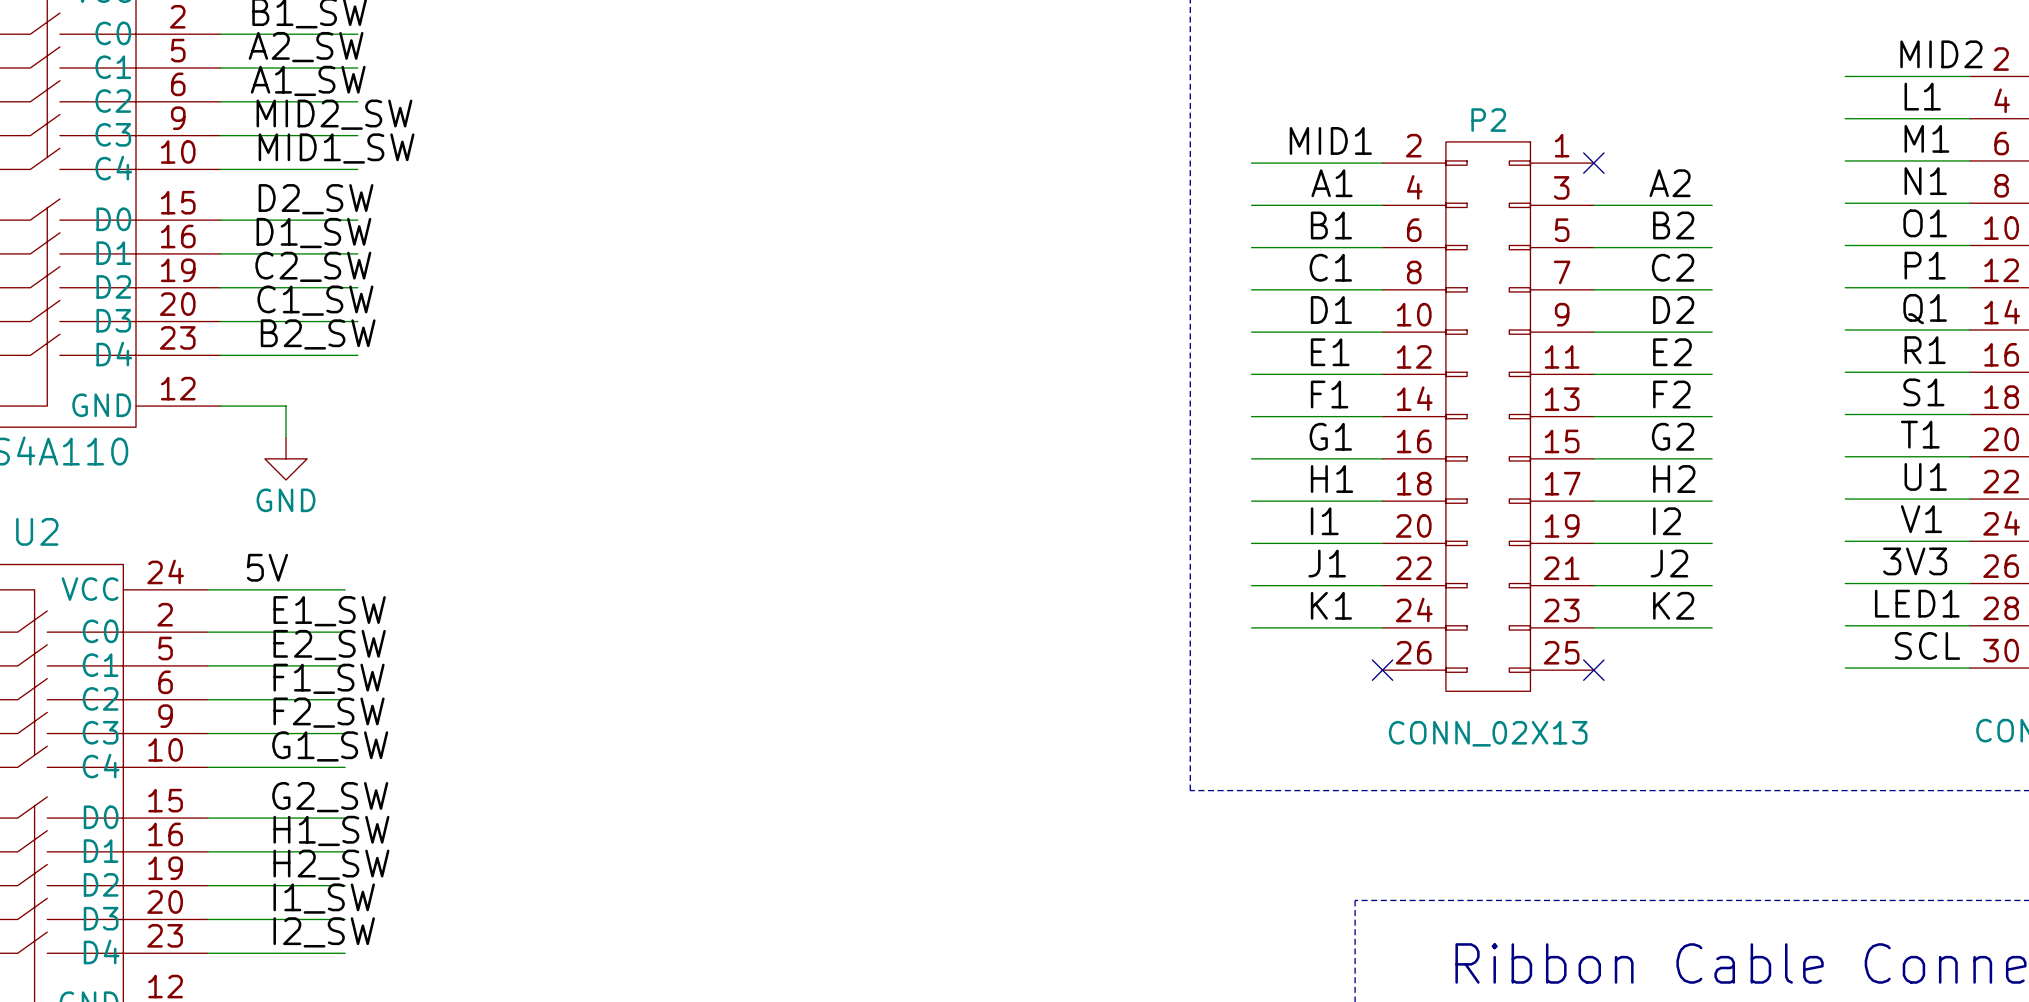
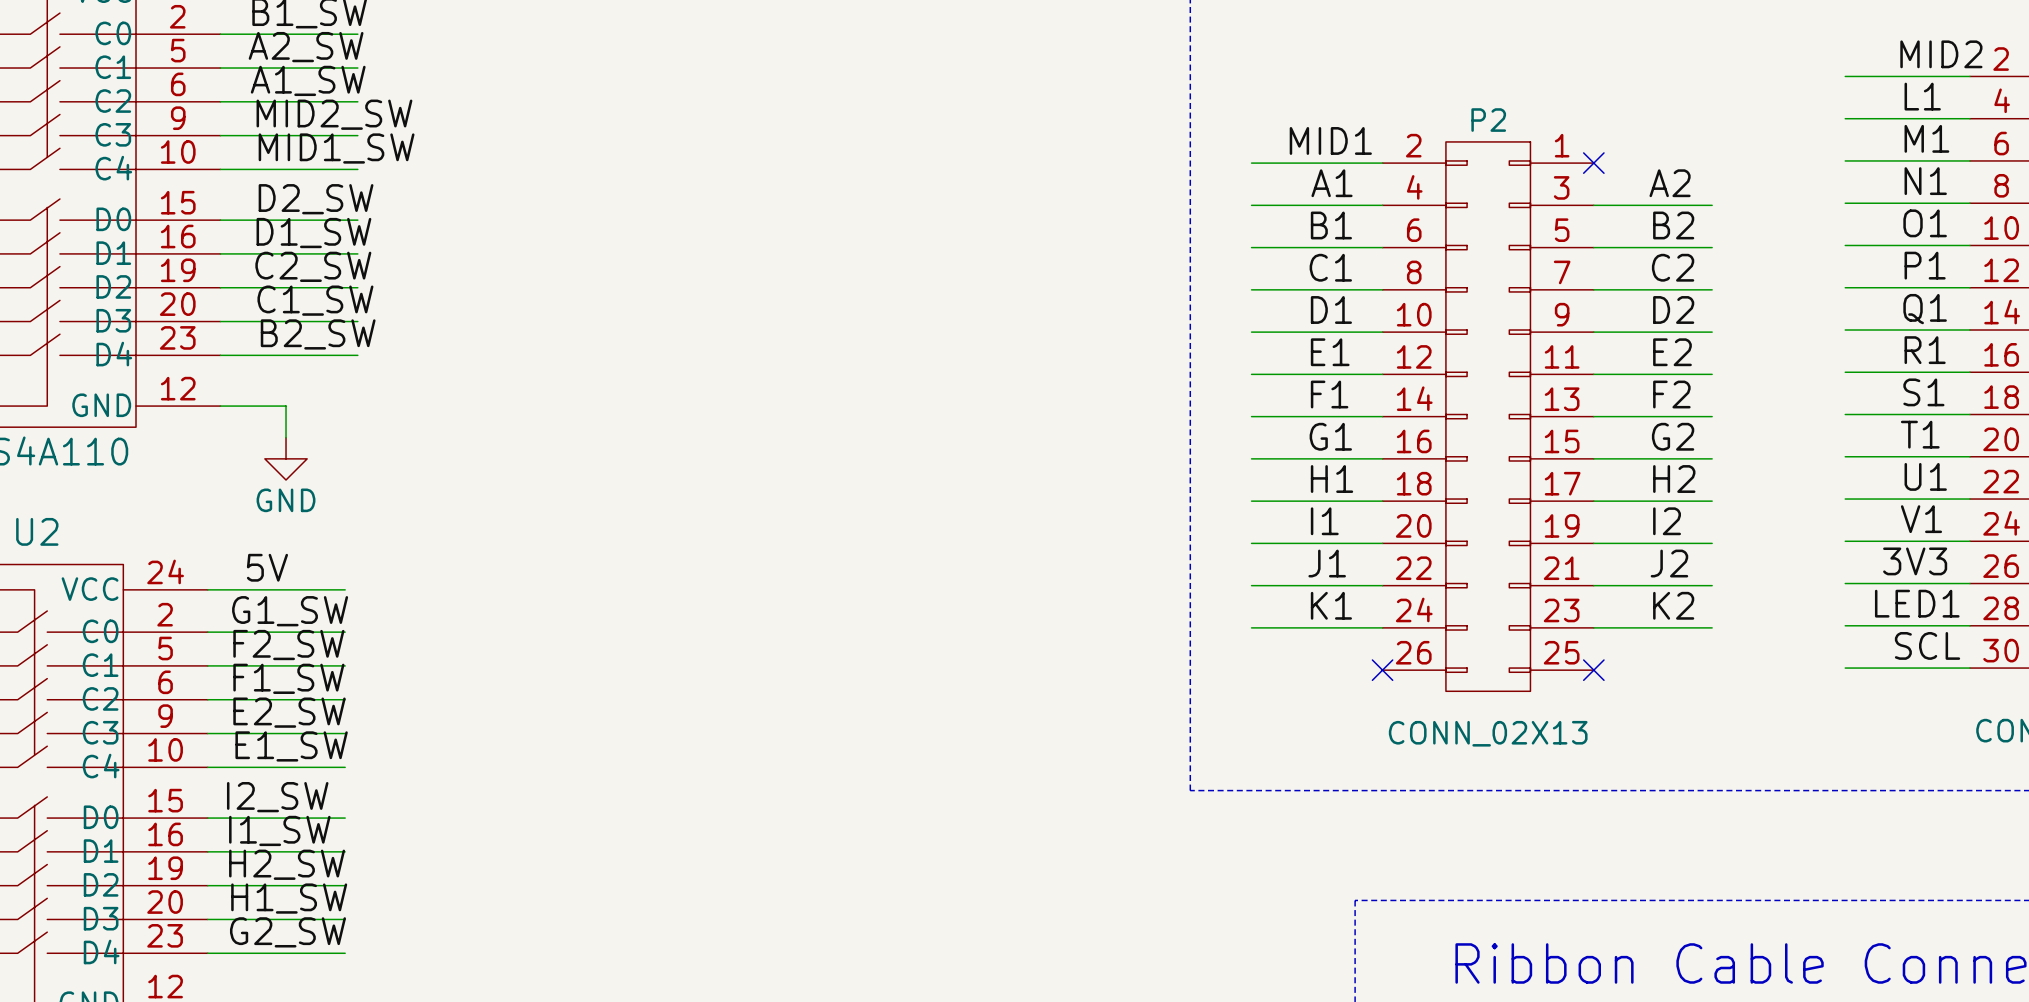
label position: E1_SW (329, 611) -> E1_SW (291, 746)
label position: E2_SW (329, 645) -> E2_SW (289, 712)
label position: F1_SW (329, 678) -> F1_SW (288, 678)
label position: F2_SW (329, 712) -> F2_SW (288, 645)
label position: G1_SW (330, 746) -> G1_SW (290, 611)
label position: G2_SW (330, 797) -> G2_SW (287, 932)
label position: H1_SW (331, 830) -> H1_SW (289, 898)
label position: H2_SW (331, 864) -> H2_SW (287, 864)
label position: I1_SW (324, 898) -> I1_SW (279, 830)
label position: I2_SW (324, 932) -> I2_SW (277, 797)

